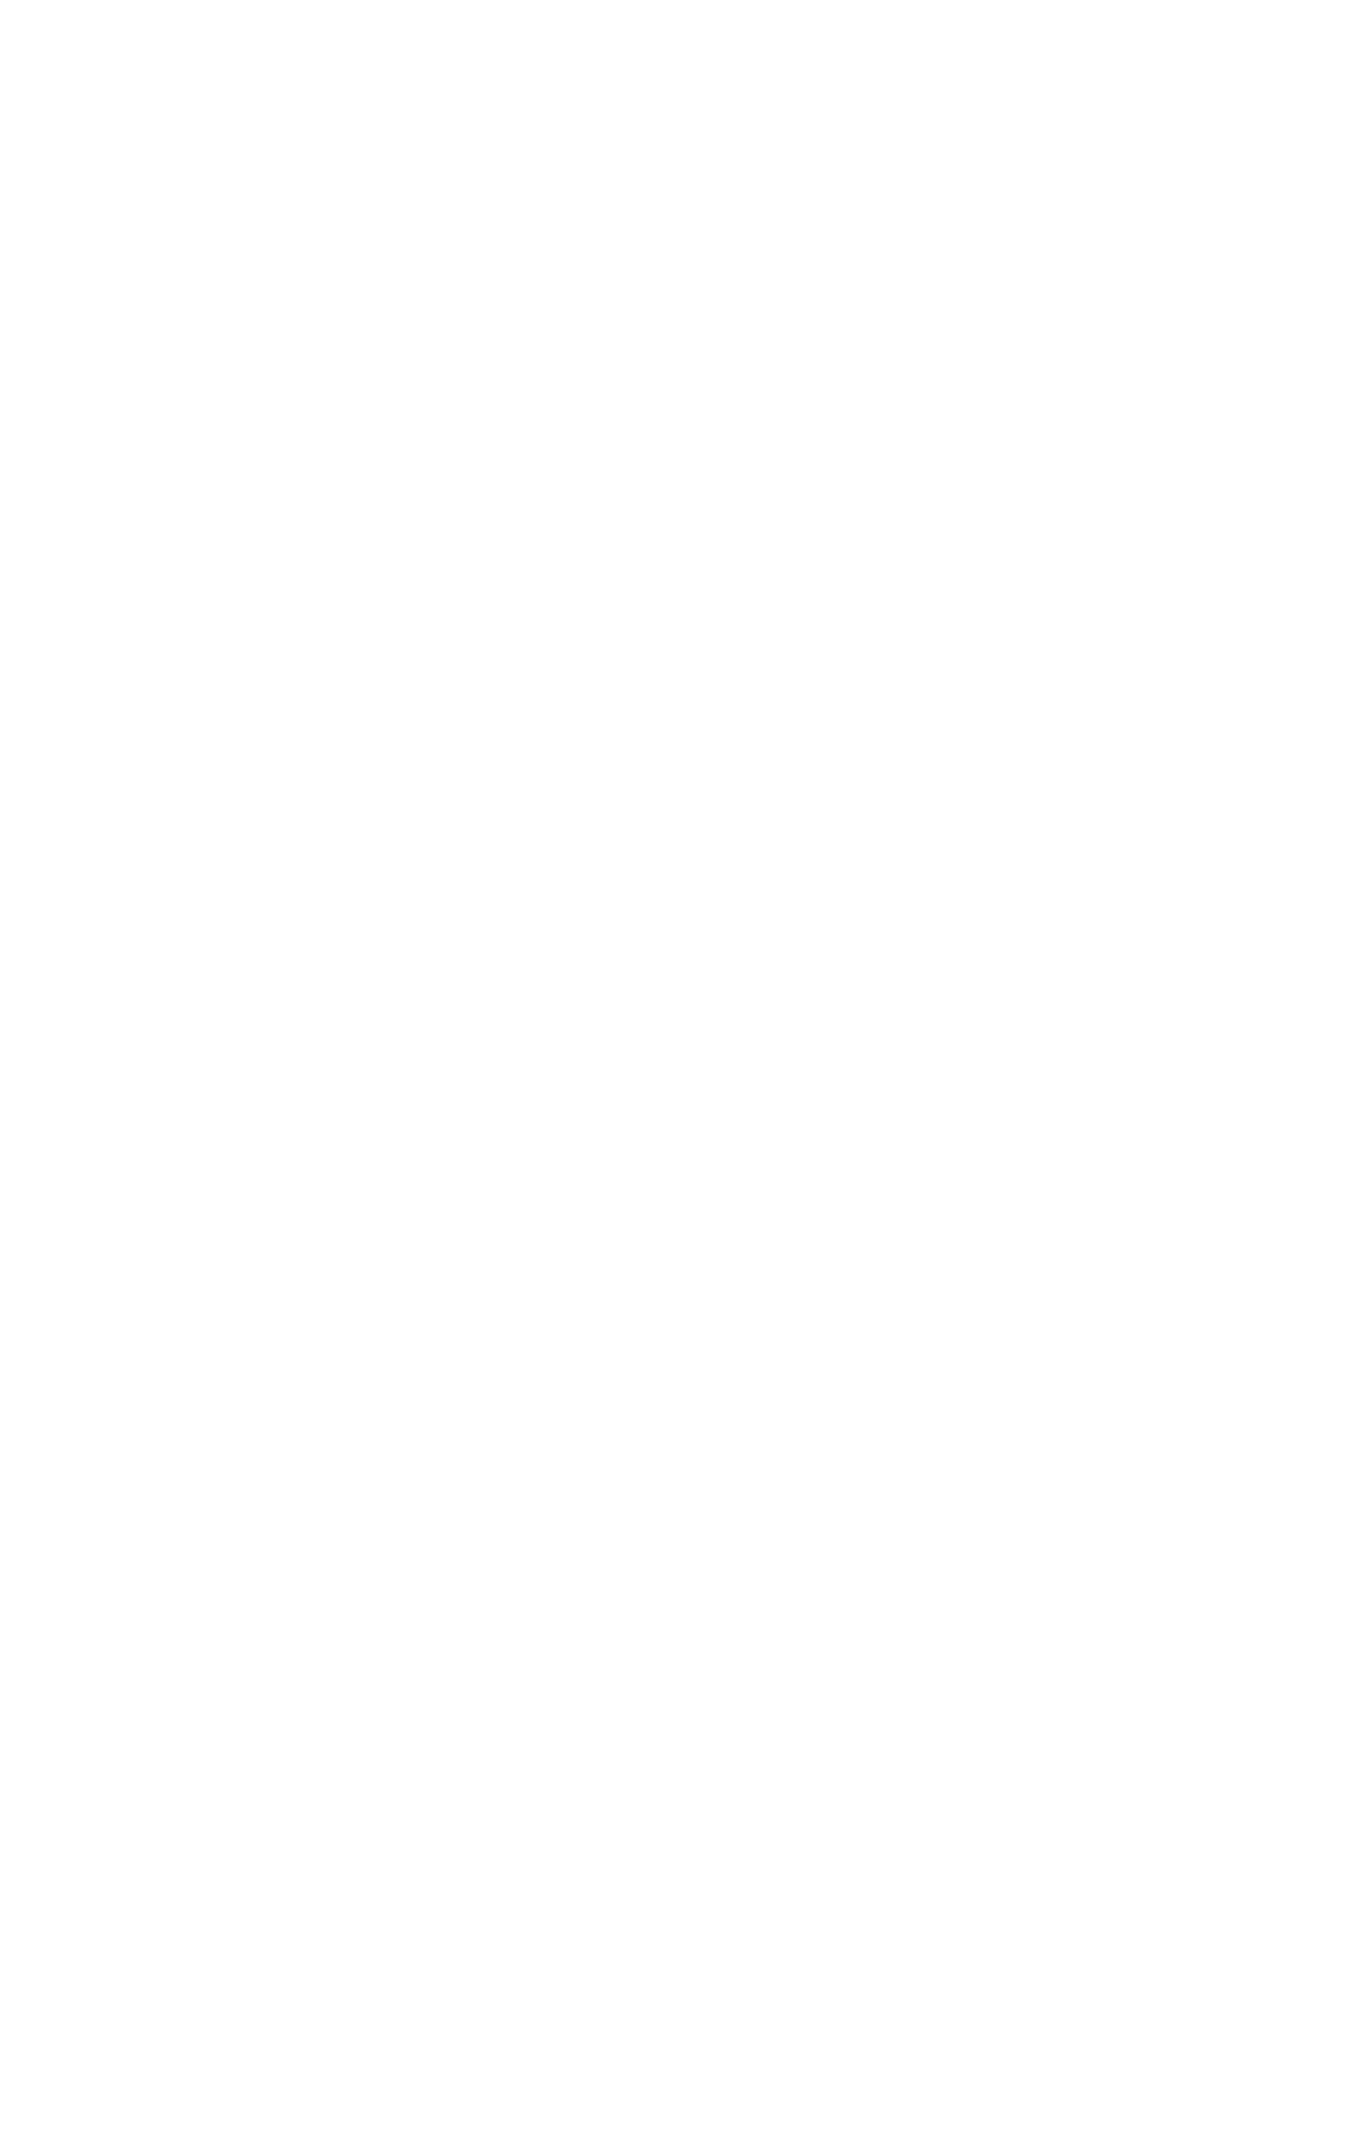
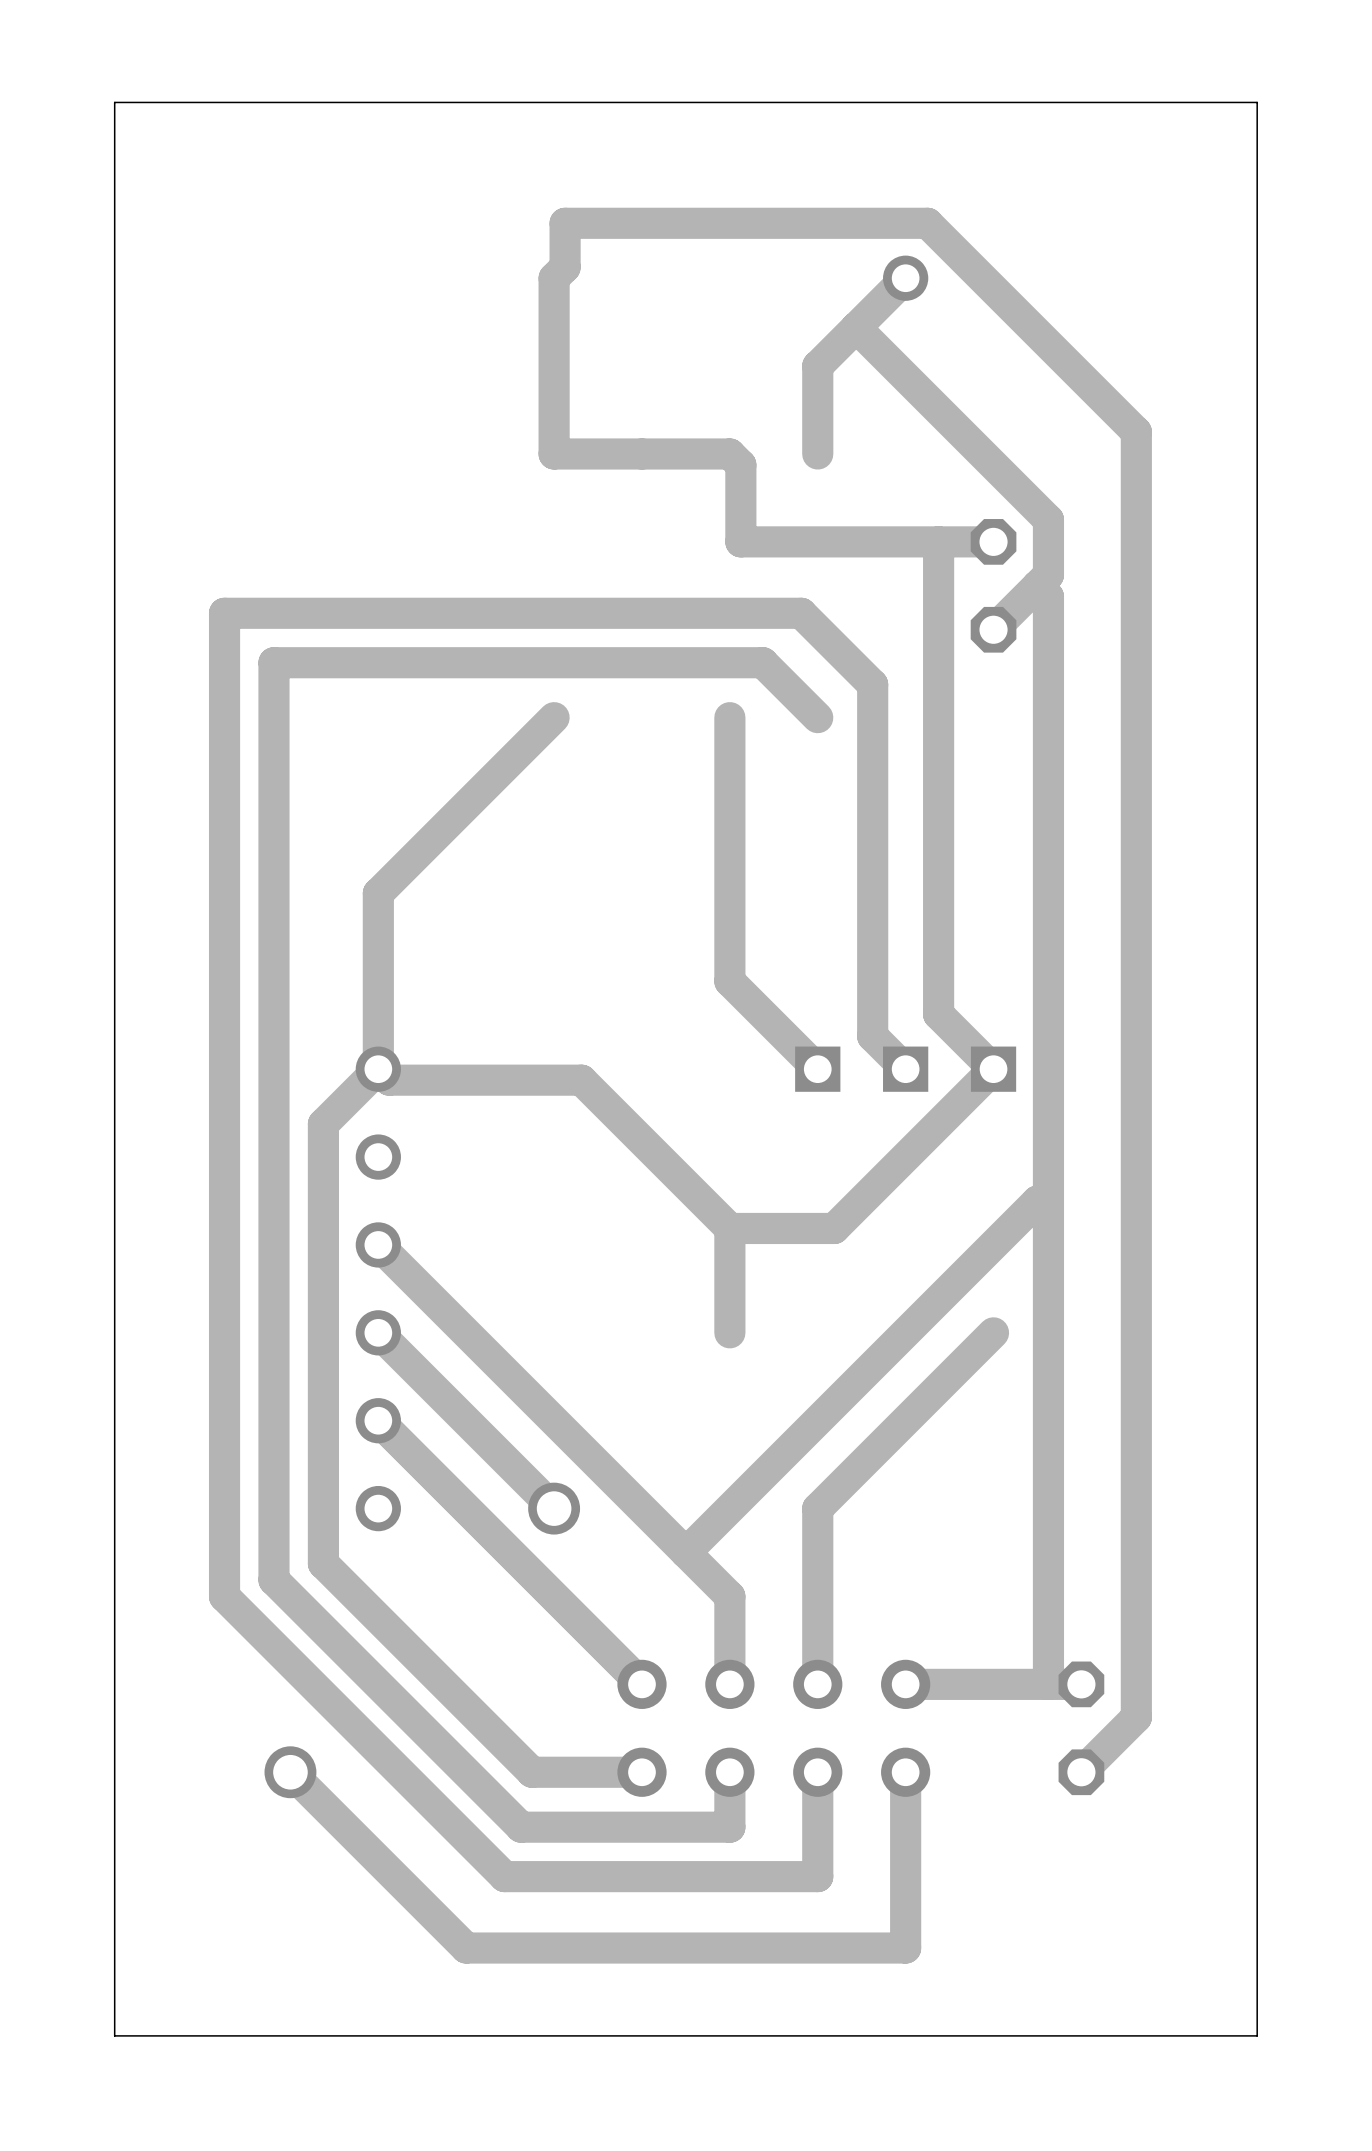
board edge: none -> (1257, 102) (114, 102) (114, 2035) (1257, 2035) (1257, 102)
track: none -> (905, 278) (817, 366) (817, 453)
part: none -> (905, 278)
track: none -> (856, 327) (1048, 519) (1048, 574) (993, 629)
track: none -> (938, 541) (938, 1014) (993, 1069) (834, 1228) (729, 1228)
track: none -> (993, 541) (740, 541) (740, 464) (729, 453) (554, 453) (554, 278) (565, 267) (565, 223) (927, 223) (1136, 432) (1136, 1717) (1081, 1772)
part: none -> (993, 585)
track: none -> (1037, 585) (1048, 596) (1048, 1684)
track: none -> (554, 717) (378, 893) (378, 1069)
track: none -> (729, 717) (729, 981) (817, 1069)
track: none -> (817, 717) (762, 662) (273, 662) (273, 1580) (521, 1827) (729, 1827) (729, 1772)
track: none -> (378, 1069) (323, 1124) (323, 1563) (532, 1772) (641, 1772)
track: none -> (378, 1069) (389, 1080) (581, 1080) (729, 1228)
track: none -> (905, 1069) (872, 1036) (872, 684) (801, 613) (224, 613) (224, 1596) (504, 1876) (817, 1876) (817, 1772)
part: none -> (905, 1069)
track: none -> (1048, 1201) (1037, 1201) (685, 1552)
track: none -> (729, 1228) (729, 1332)
track: none -> (378, 1244) (729, 1596) (729, 1684)
part: none -> (378, 1288)
track: none -> (378, 1332) (554, 1508)
track: none -> (993, 1332) (817, 1508) (817, 1684)
track: none -> (378, 1420) (641, 1684)
via: none -> (554, 1508)
track: none -> (1081, 1684) (905, 1684)
part: none -> (773, 1728)
part: none -> (1081, 1728)
via: none -> (290, 1772)
track: none -> (905, 1772) (905, 1948) (466, 1948) (290, 1772)

